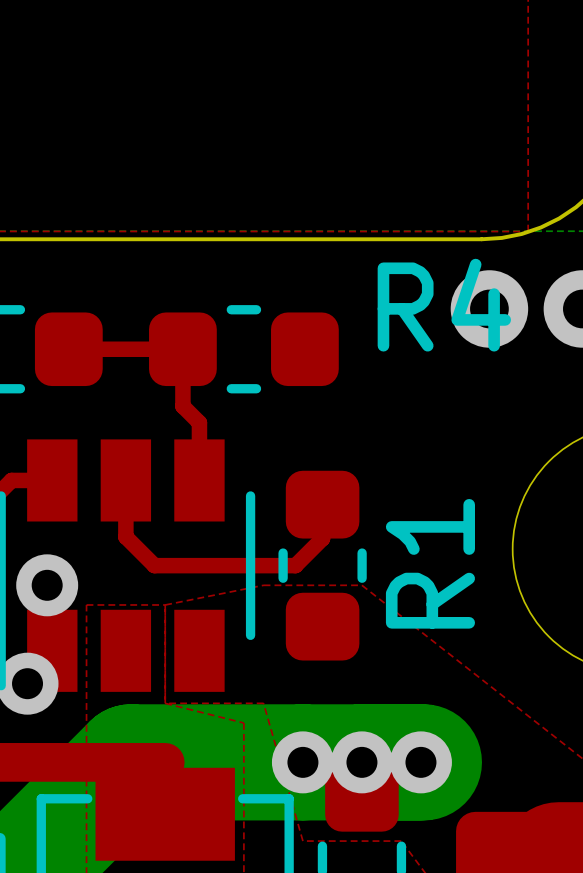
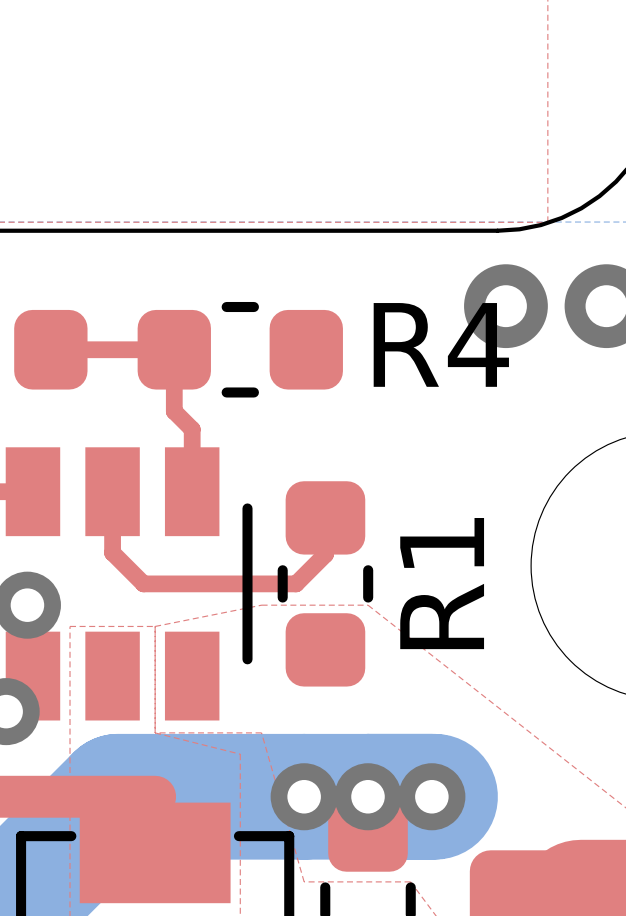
R4 name position: R4 (444, 305) -> R4 (441, 344)

